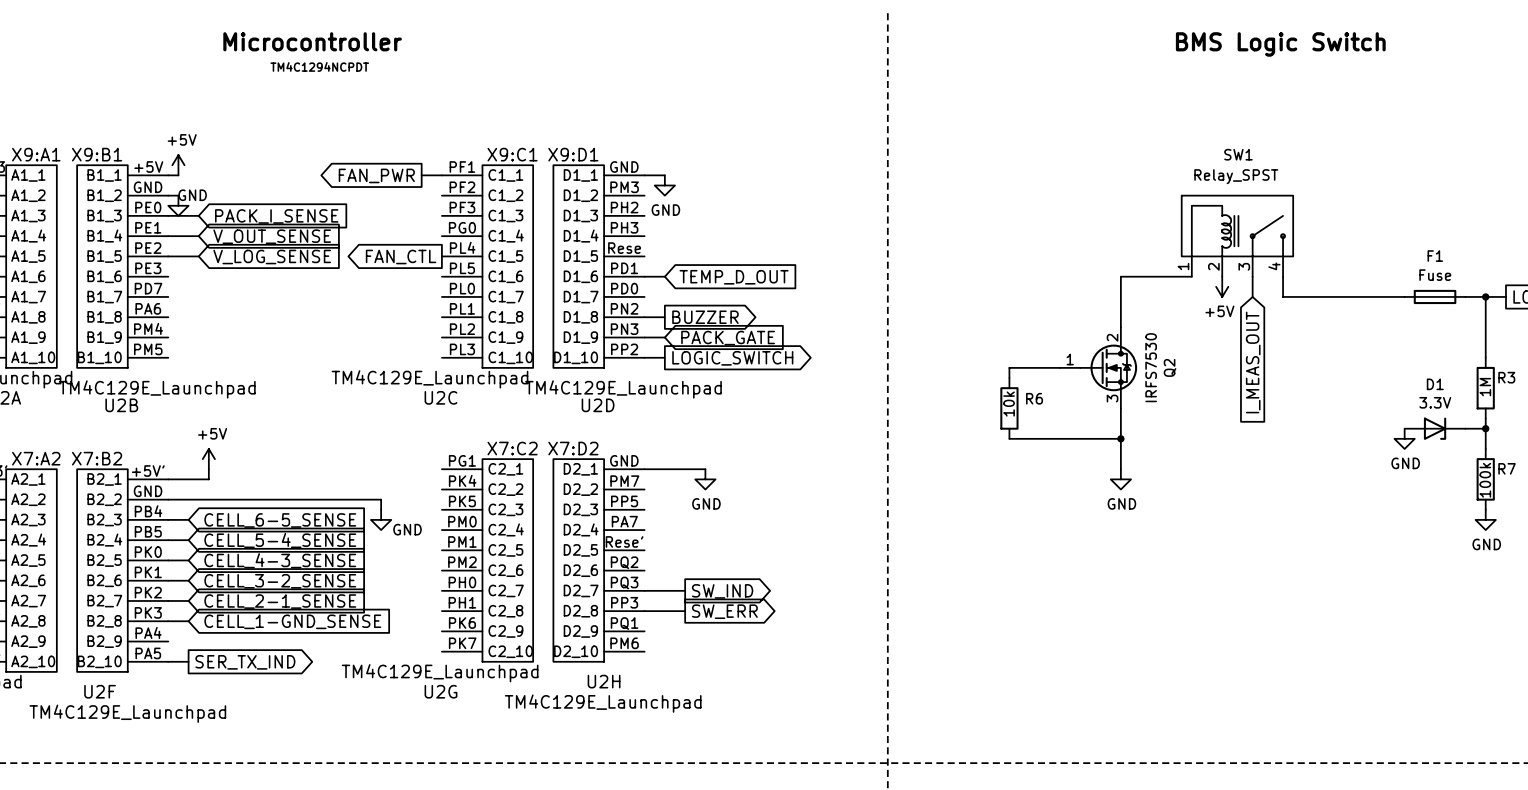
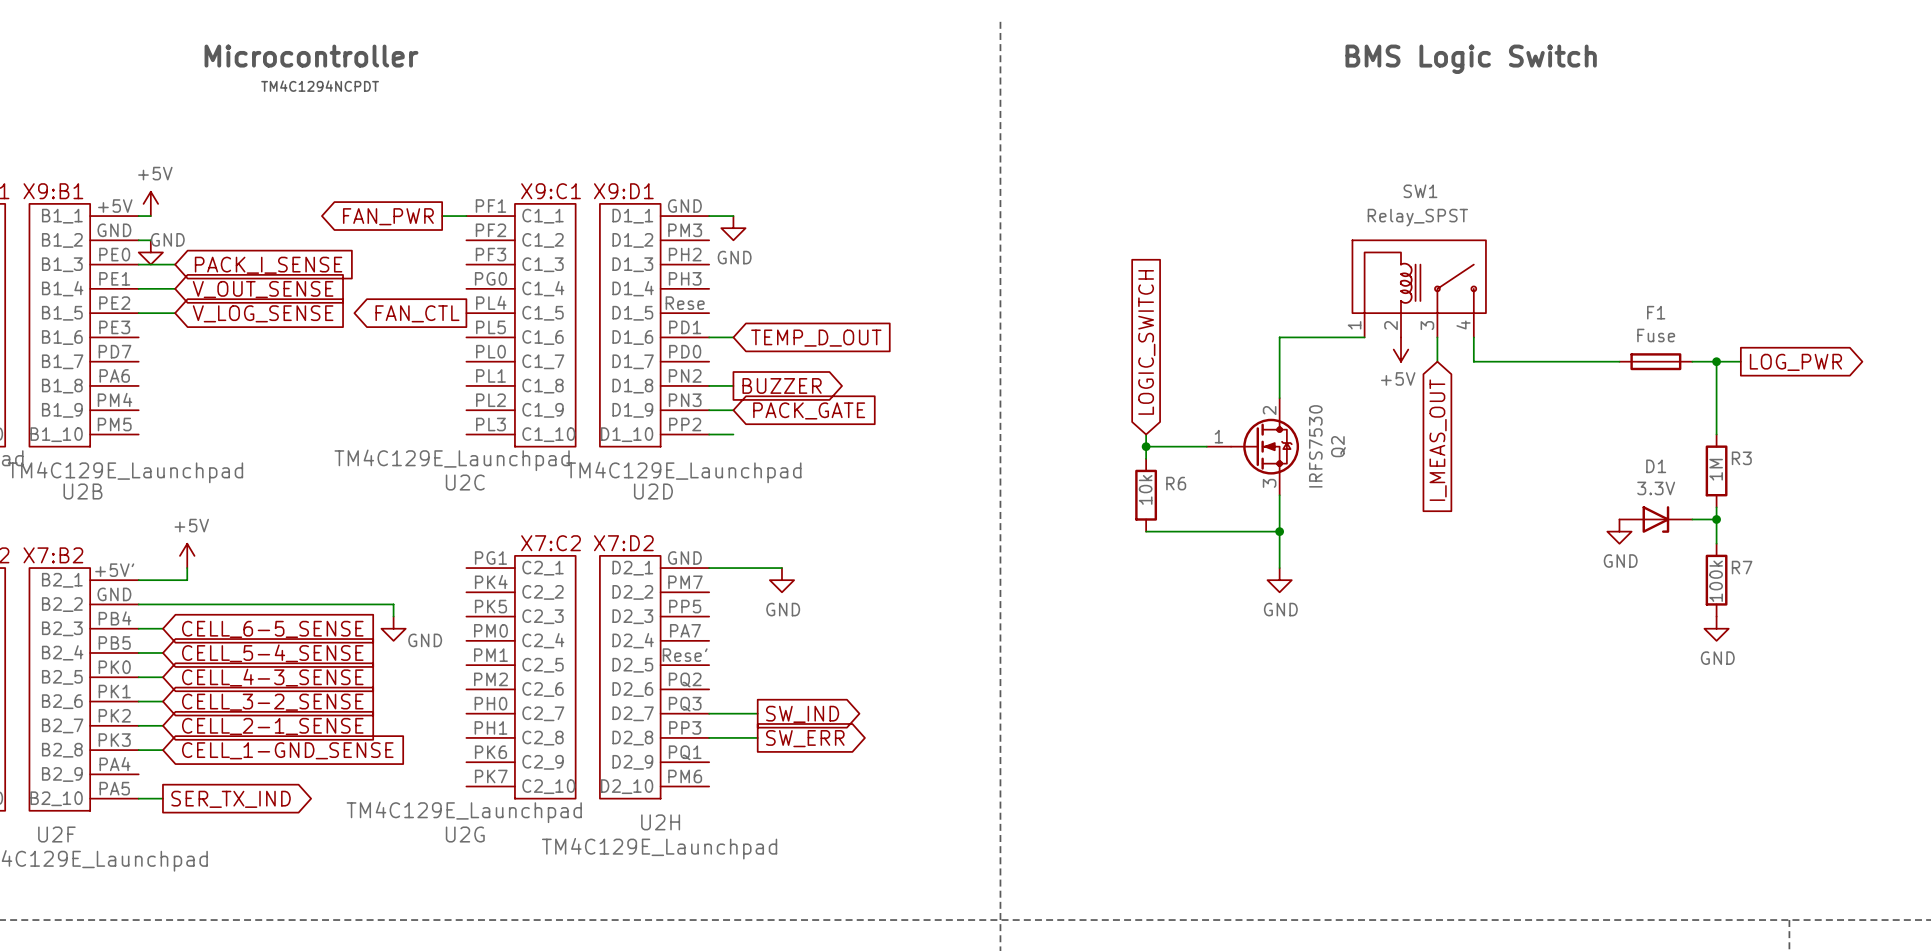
global label: none -> LOGIC_SWITCH (1146, 342)
wire: none -> (1146, 434) (1146, 446)
global label: LOGIC_SWITCH (732, 358) -> none
junction: none -> (1146, 446)

